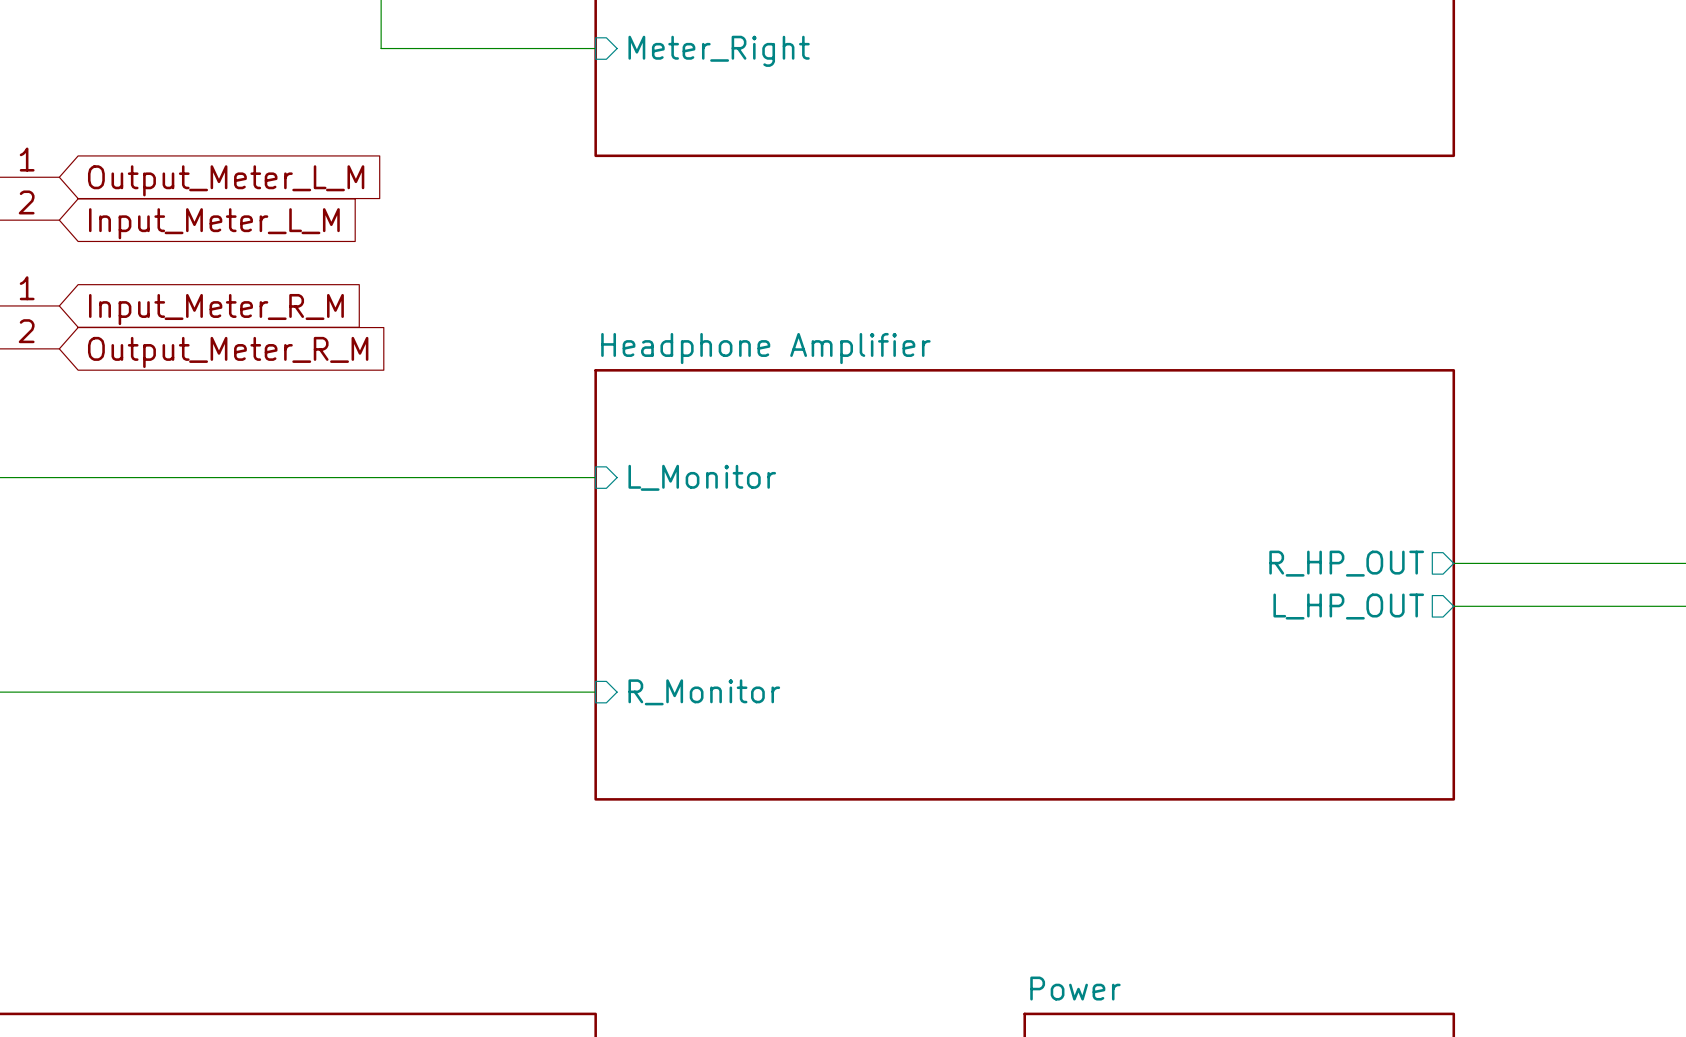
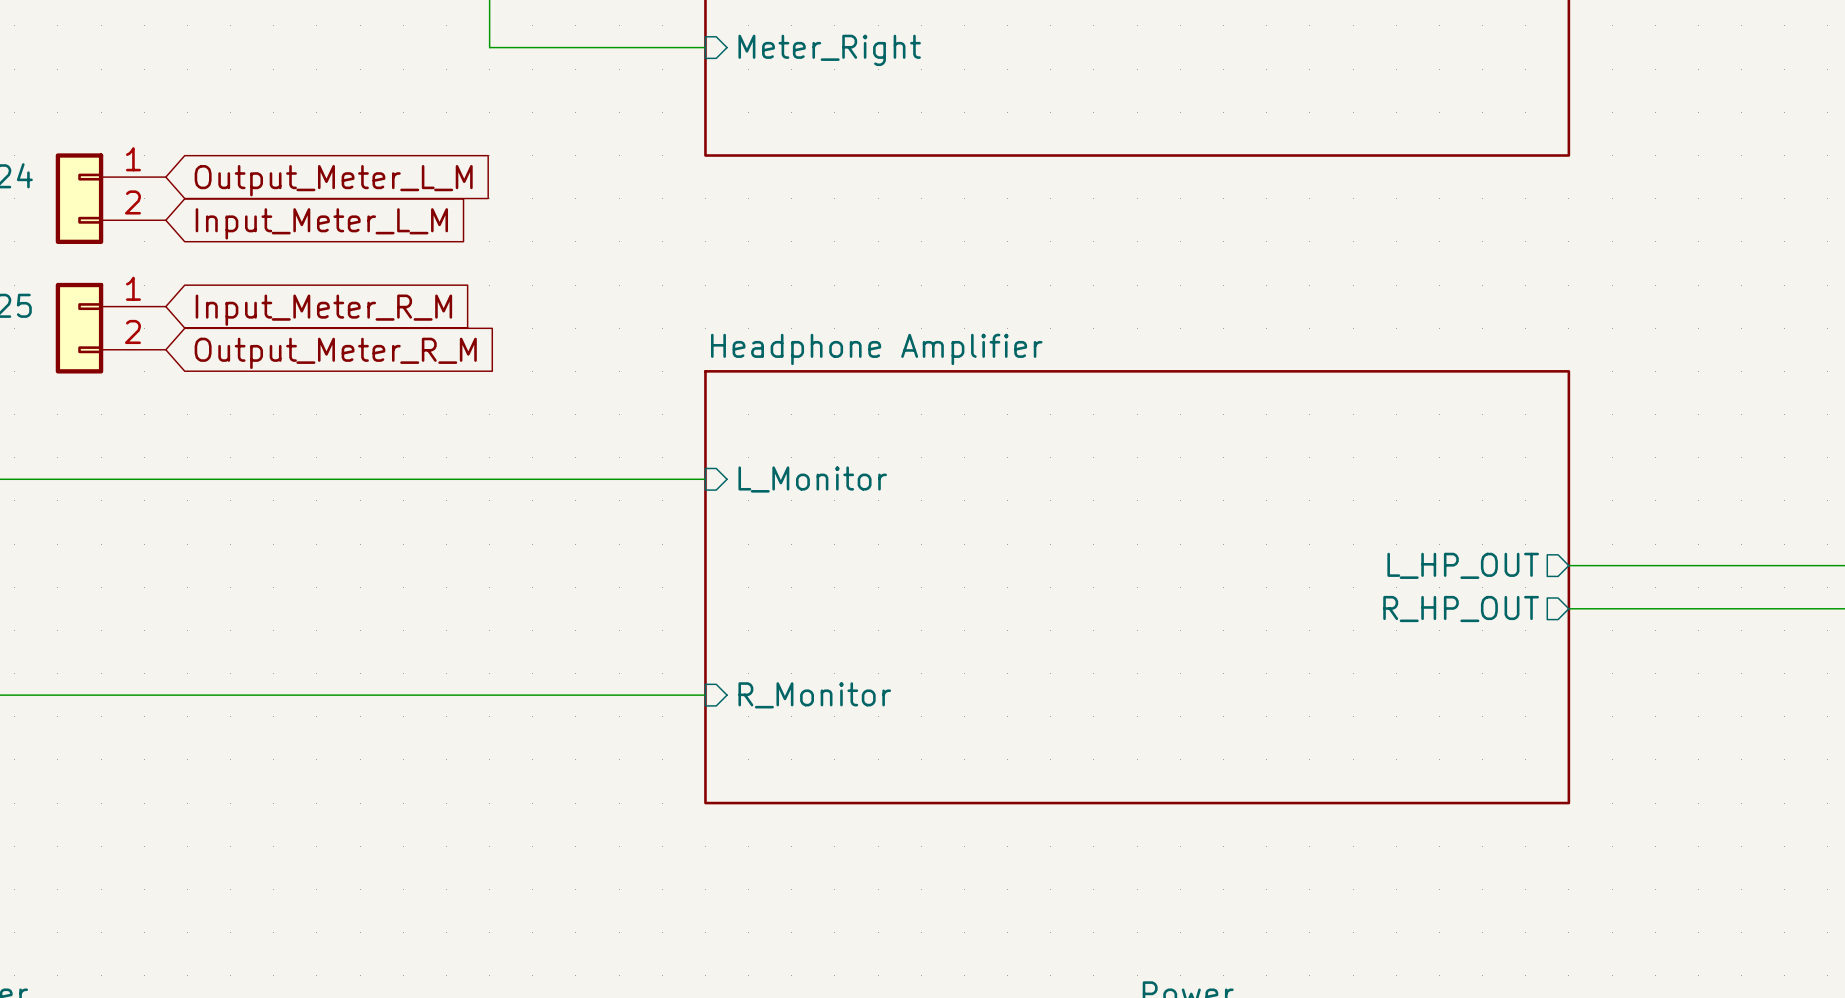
sheet pin: R_HP_OUT (1346, 563) -> L_HP_OUT (1463, 565)
sheet pin: L_HP_OUT (1348, 606) -> R_HP_OUT (1461, 609)

